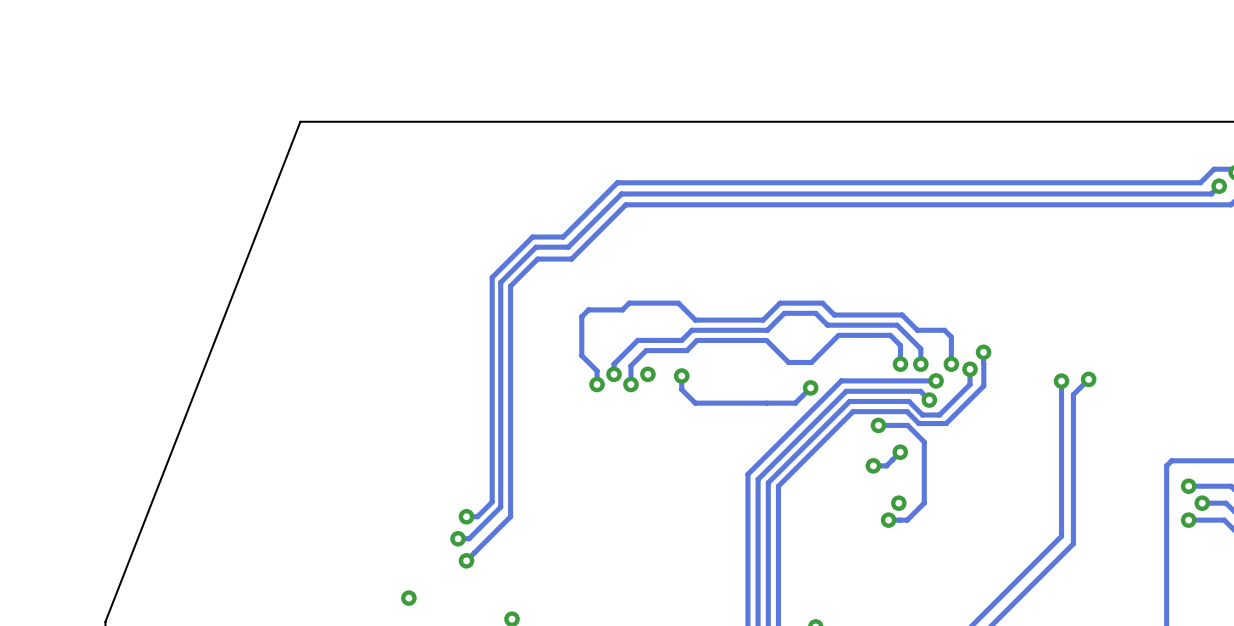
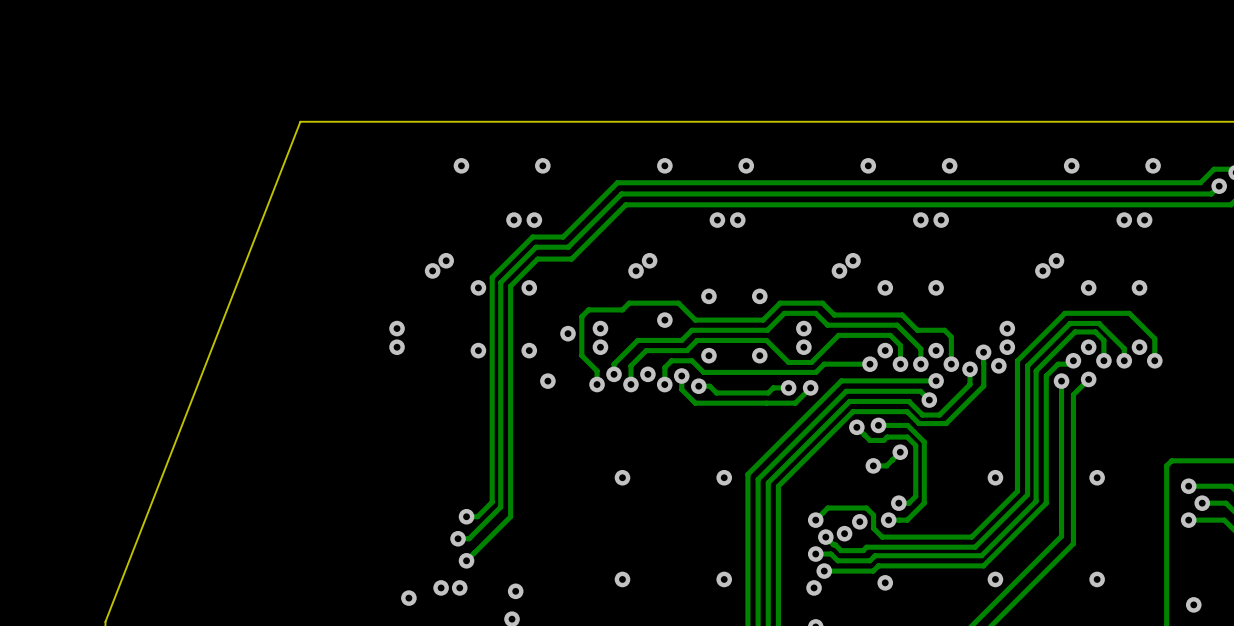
via: none -> (461, 165)
via: none -> (542, 165)
via: none -> (664, 165)
via: none -> (746, 165)
via: none -> (868, 165)
via: none -> (949, 165)
via: none -> (1071, 165)
via: none -> (1153, 165)
via: none -> (514, 220)
via: none -> (534, 220)
via: none -> (717, 220)
via: none -> (737, 220)
via: none -> (920, 220)
via: none -> (941, 220)
via: none -> (1124, 220)
via: none -> (1144, 220)
via: none -> (446, 260)
via: none -> (649, 260)
via: none -> (853, 260)
via: none -> (1056, 260)
via: none -> (432, 270)
via: none -> (636, 270)
via: none -> (839, 270)
via: none -> (1042, 270)
via: none -> (478, 287)
via: none -> (529, 287)
via: none -> (885, 287)
via: none -> (936, 287)
via: none -> (1088, 287)
via: none -> (1139, 287)
via: none -> (708, 296)
via: none -> (759, 296)
via: none -> (664, 320)
via: none -> (397, 328)
via: none -> (600, 328)
via: none -> (803, 328)
via: none -> (1007, 328)
via: none -> (568, 333)
via: none -> (397, 347)
via: none -> (600, 347)
via: none -> (803, 347)
via: none -> (1007, 347)
via: none -> (1088, 347)
via: none -> (1139, 347)
via: none -> (478, 350)
via: none -> (529, 350)
via: none -> (885, 350)
via: none -> (936, 350)
via: none -> (708, 355)
via: none -> (759, 355)
via: none -> (1073, 360)
via: none -> (1103, 360)
via: none -> (1124, 360)
via: none -> (1154, 360)
track: none -> (869, 364) (824, 364) (815, 372) (703, 372) (691, 360) (671, 360) (664, 367) (664, 386)
via: none -> (869, 364)
track: none -> (1073, 364) (1058, 364) (1046, 375) (1046, 503) (983, 565) (878, 565) (873, 571) (824, 571)
track: none -> (1103, 364) (1103, 340) (1095, 331) (1075, 331) (1036, 370) (1036, 501) (981, 555) (875, 555) (869, 560) (837, 560) (831, 554) (815, 554)
track: none -> (1124, 364) (1124, 348) (1098, 323) (1070, 323) (1027, 365) (1027, 494) (975, 547) (866, 547) (863, 550) (841, 550) (825, 537)
track: none -> (1154, 364) (1154, 338) (1129, 313) (1064, 313) (1017, 360) (1017, 491) (971, 537) (882, 537) (873, 528) (873, 515) (866, 508) (827, 508) (815, 520)
via: none -> (998, 365)
via: none -> (547, 381)
via: none -> (664, 384)
track: none -> (698, 386) (709, 386) (716, 392) (768, 392) (773, 387) (788, 387)
via: none -> (698, 386)
via: none -> (788, 387)
track: none -> (856, 427) (869, 440) (883, 440) (887, 437) (907, 437) (915, 445) (915, 496) (908, 503) (898, 503)
via: none -> (856, 427)
via: none -> (622, 477)
via: none -> (724, 477)
via: none -> (995, 477)
via: none -> (1097, 477)
via: none -> (815, 520)
via: none -> (859, 521)
via: none -> (844, 533)
via: none -> (825, 537)
via: none -> (815, 554)
via: none -> (824, 571)
via: none -> (622, 579)
via: none -> (724, 579)
via: none -> (995, 579)
via: none -> (1097, 579)
via: none -> (885, 582)
via: none -> (441, 587)
via: none -> (459, 587)
via: none -> (814, 587)
via: none -> (515, 591)
via: none -> (1193, 604)

